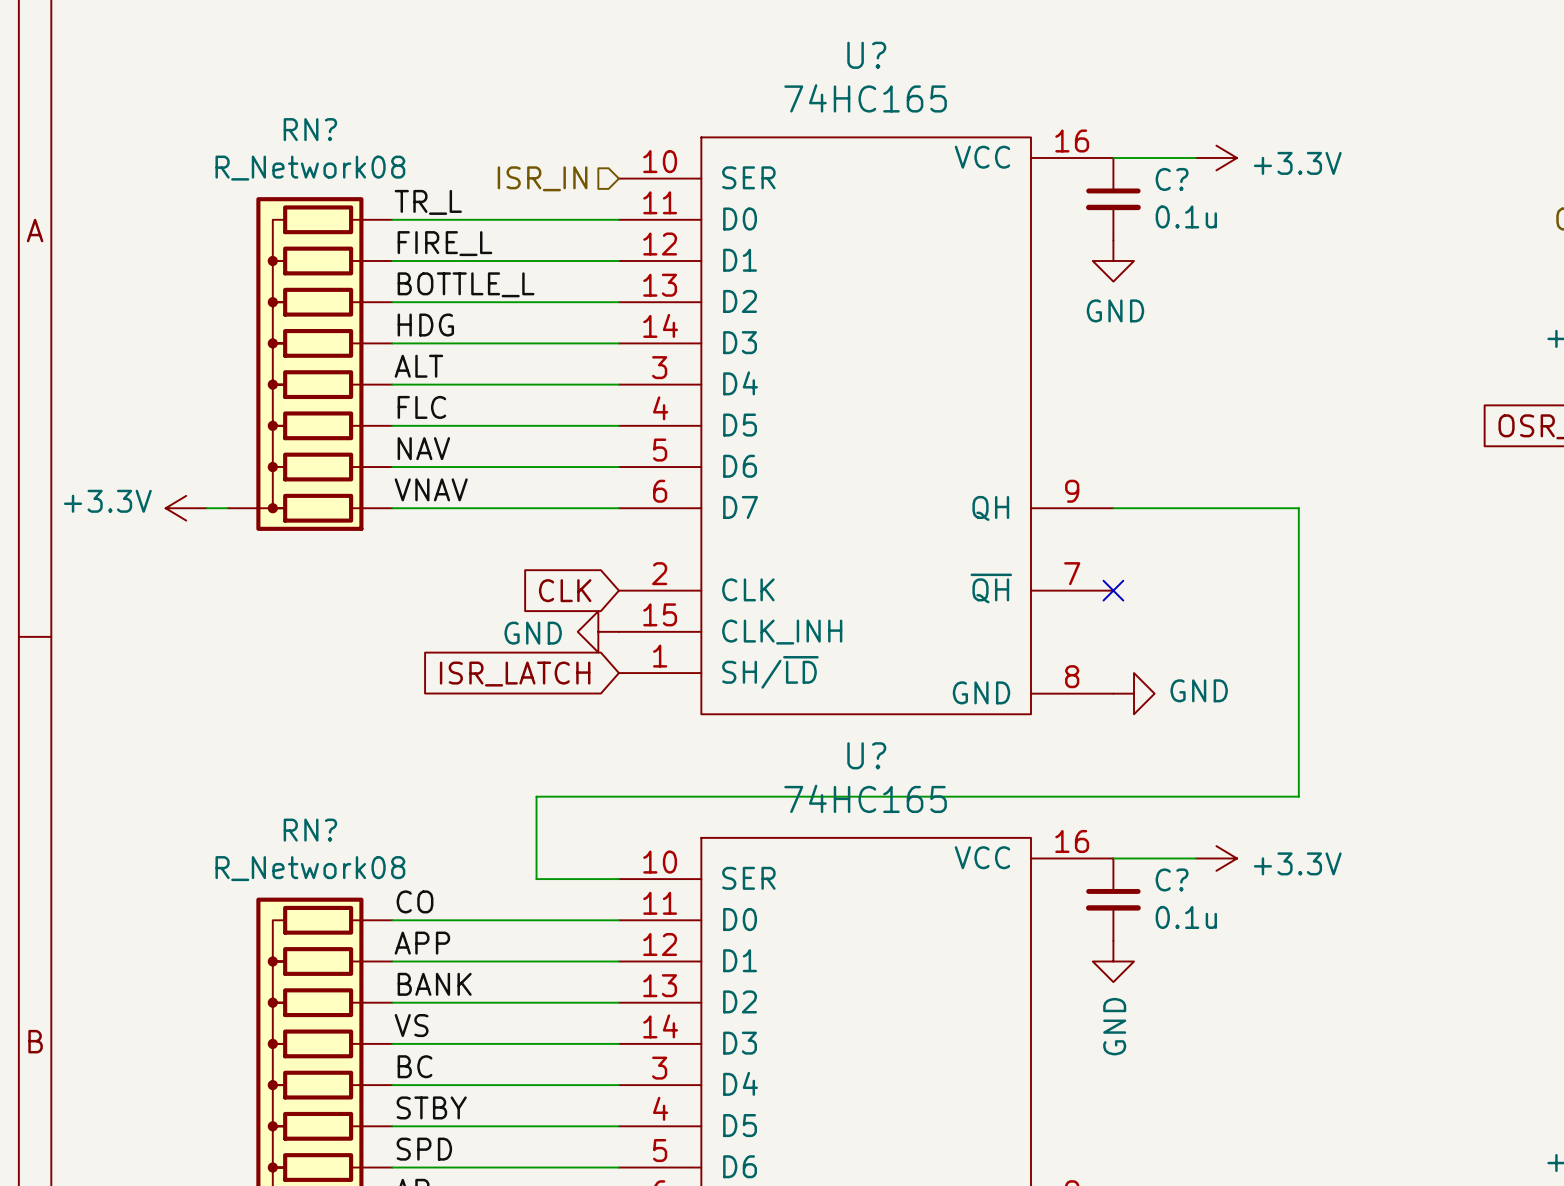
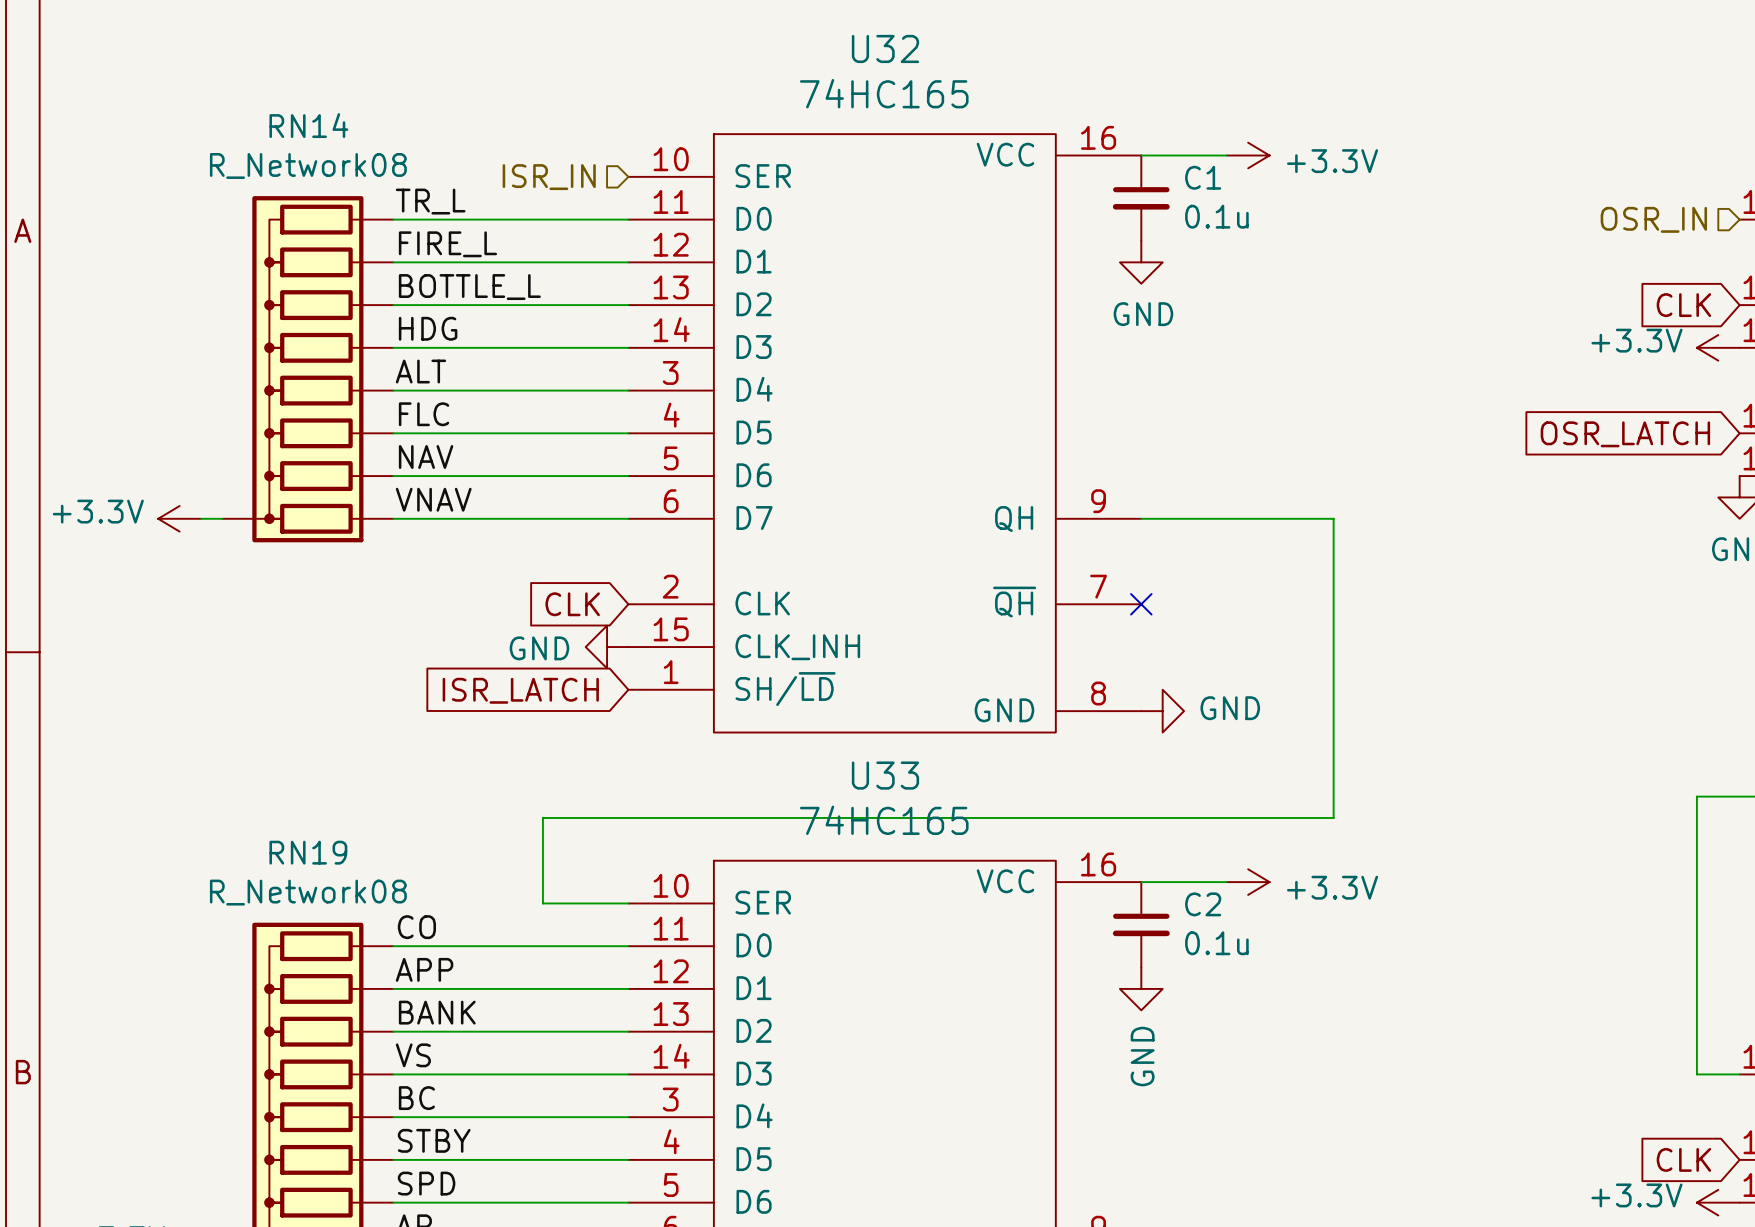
U? name: U? (866, 55) -> U32 (885, 48)
RN? name: RN? (310, 129) -> RN14 (308, 125)
C? name: C? (1172, 179) -> C1 (1203, 177)
U? name: U? (866, 755) -> U33 (885, 775)
RN? name: RN? (310, 830) -> RN19 (308, 852)
C? name: C? (1172, 879) -> C2 (1203, 904)

